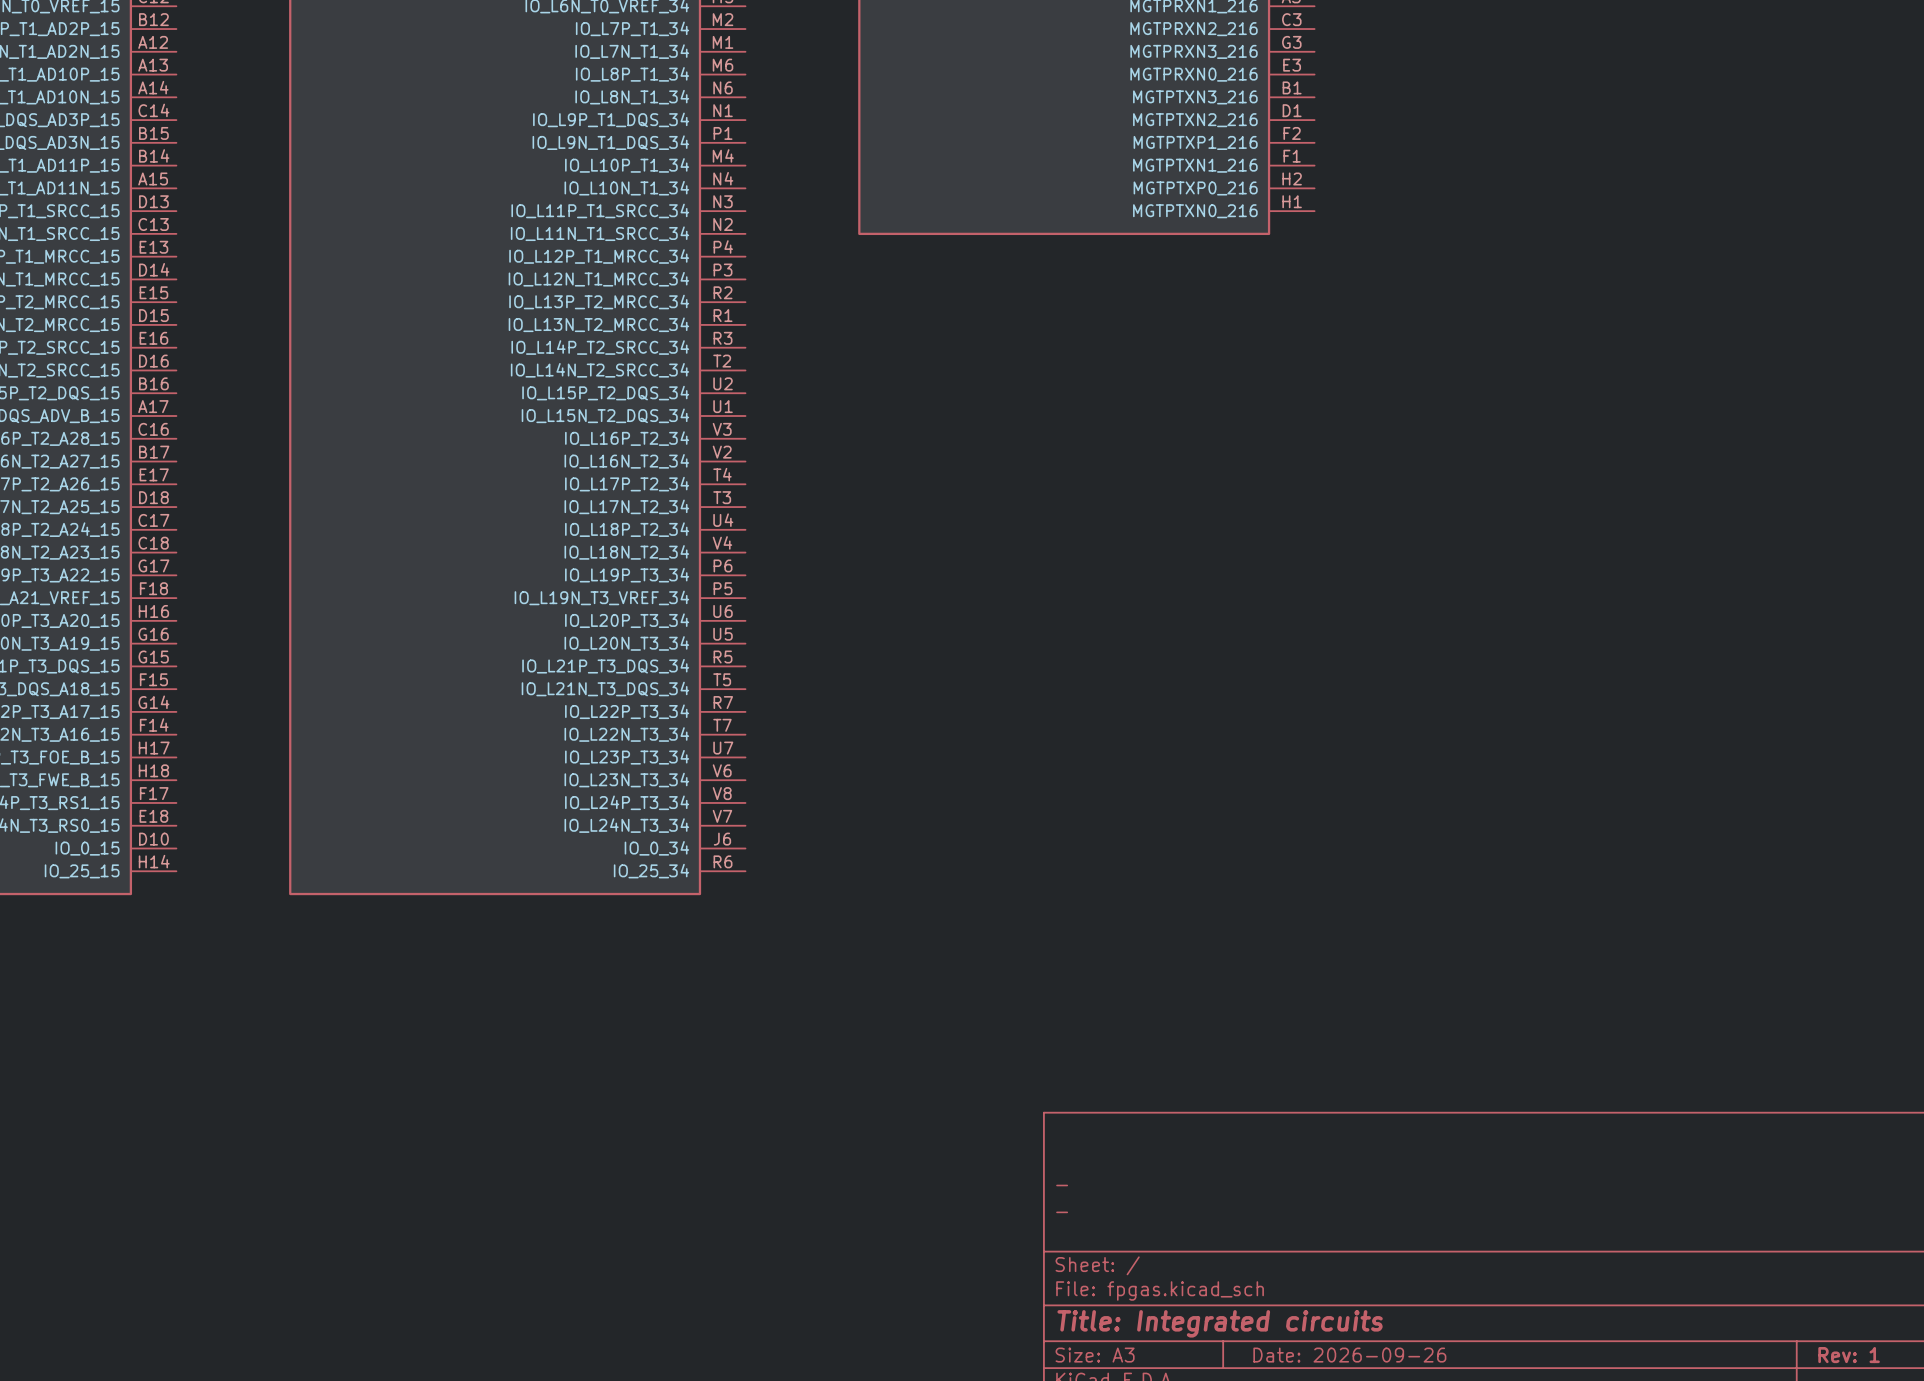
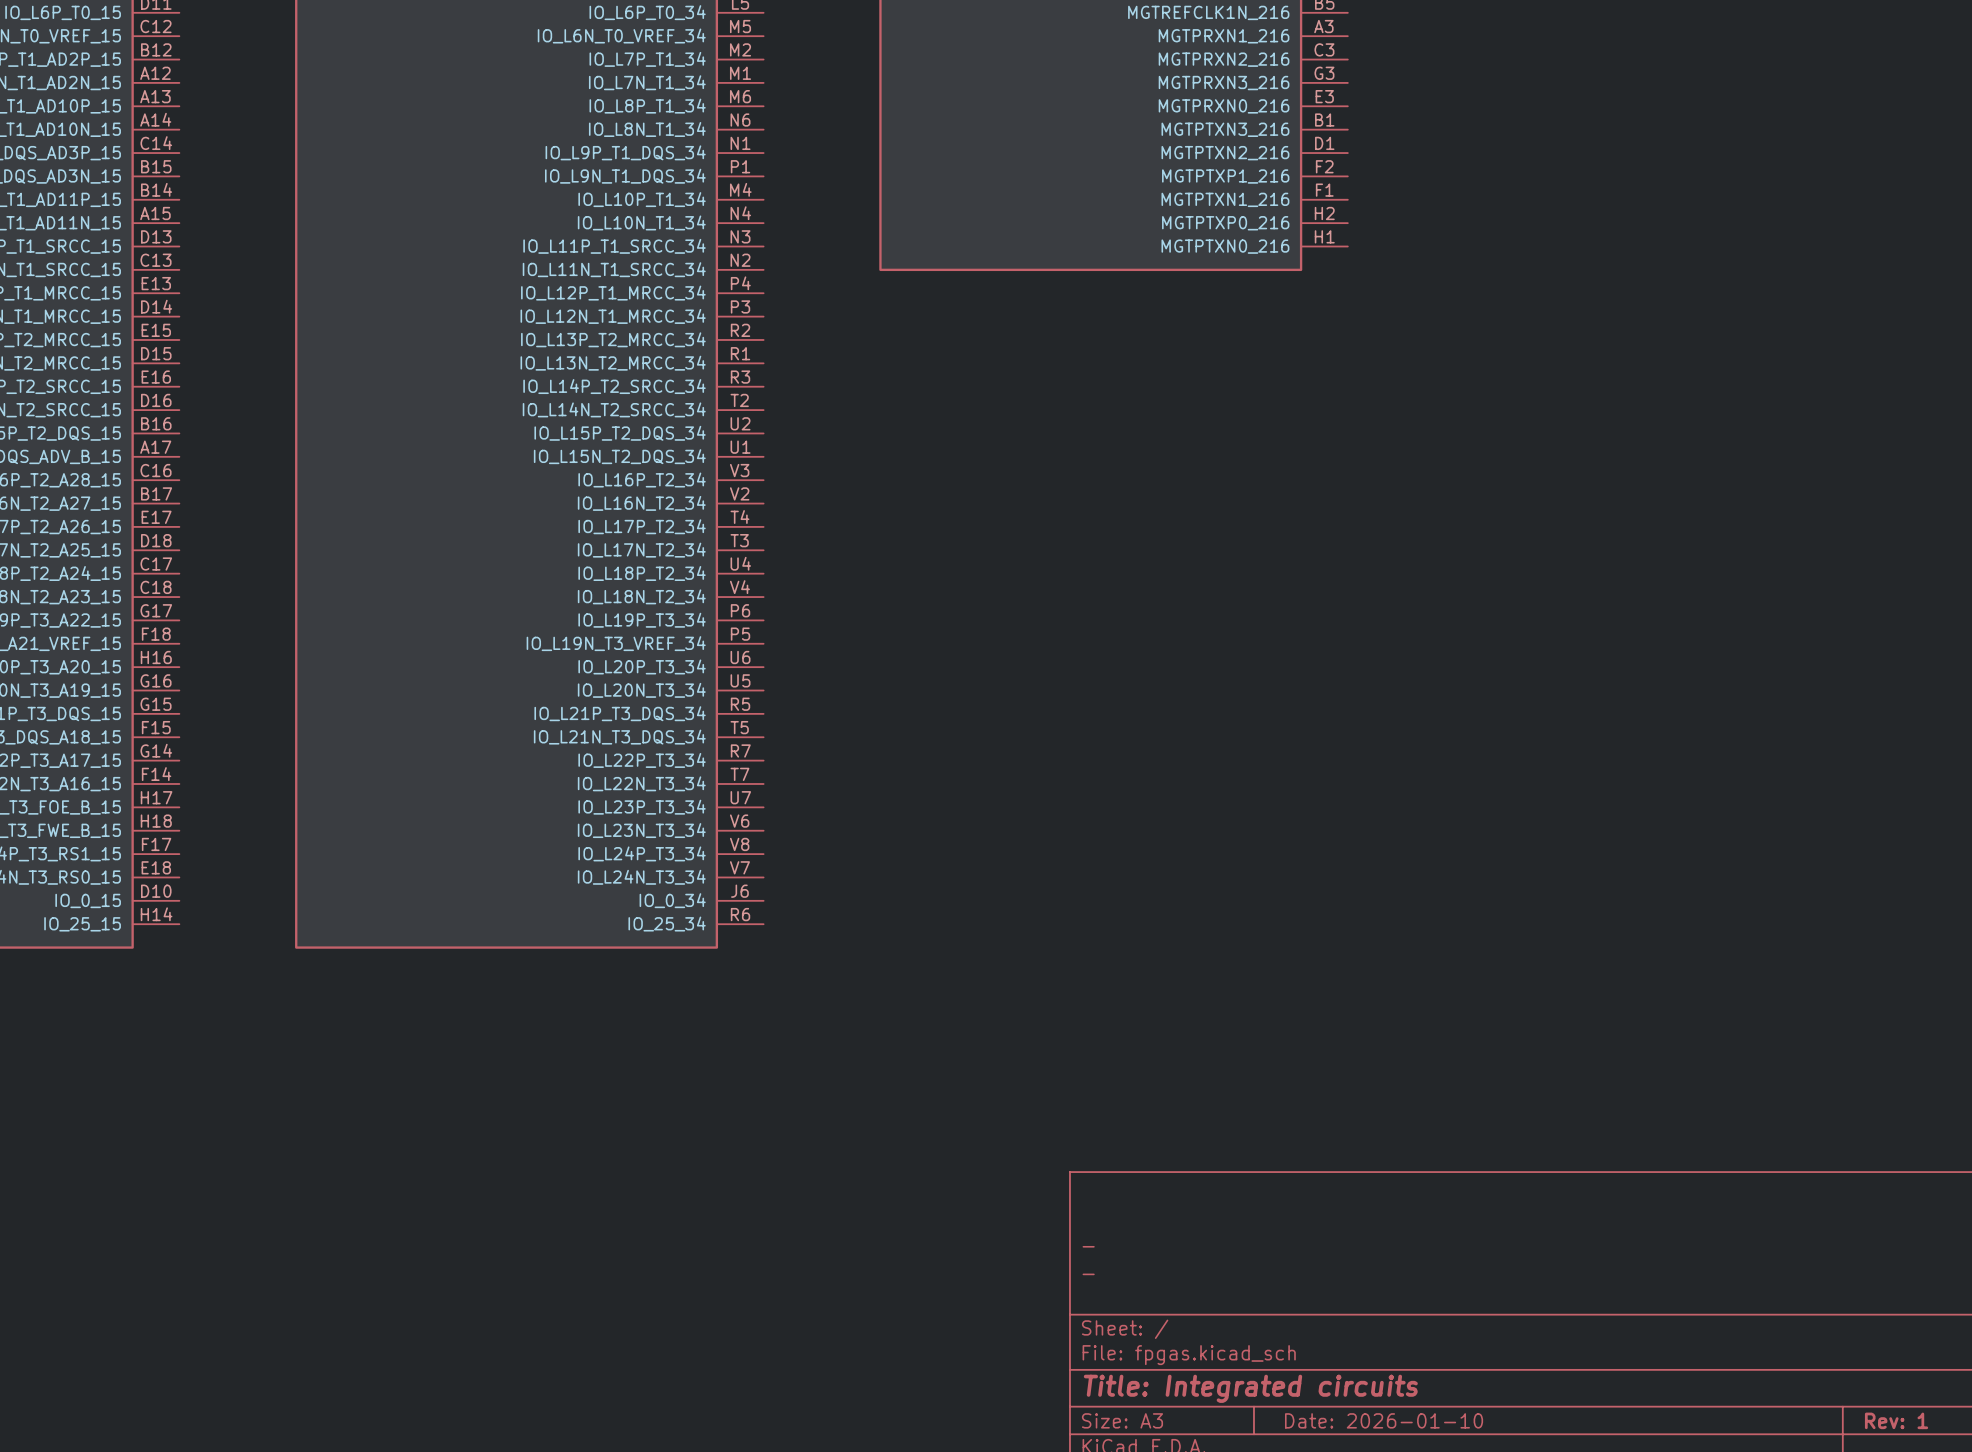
title block: Date: 2026-09-26 (1349, 1355) -> Date: 2026-01-10 (1384, 1420)

